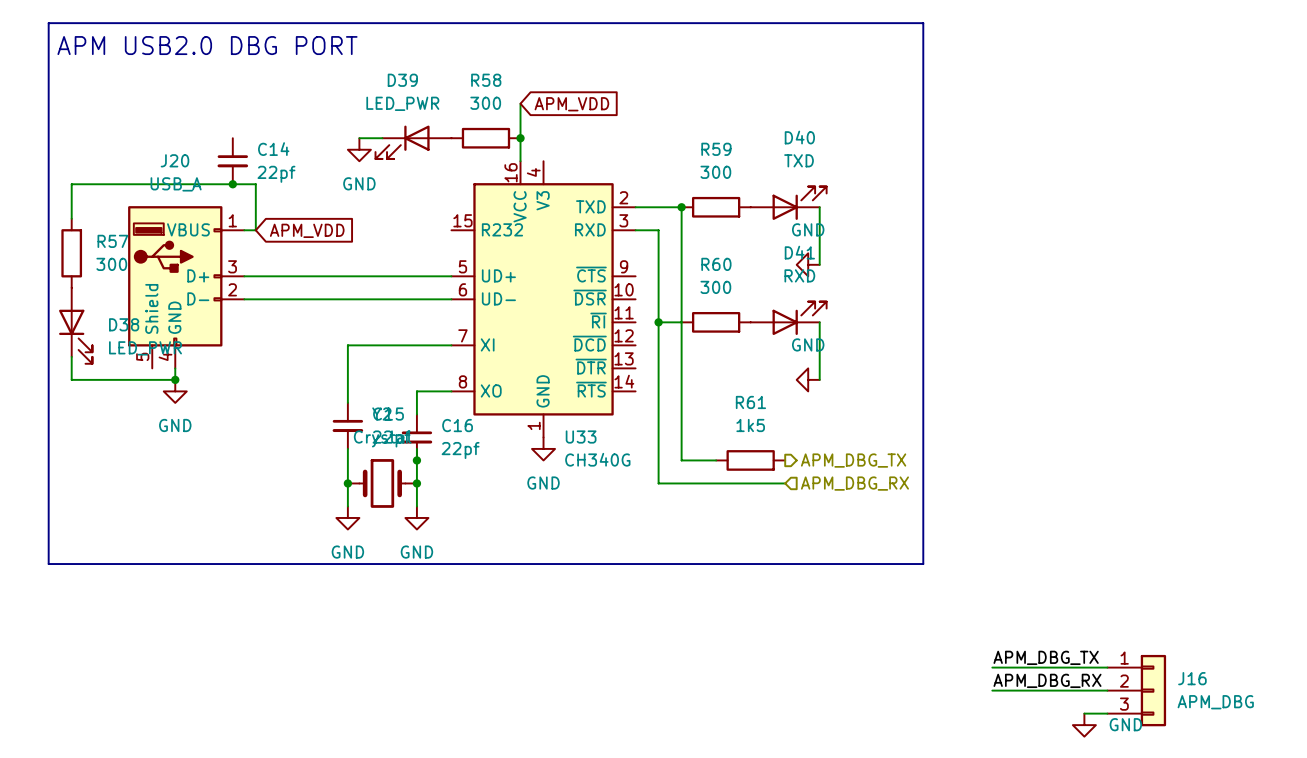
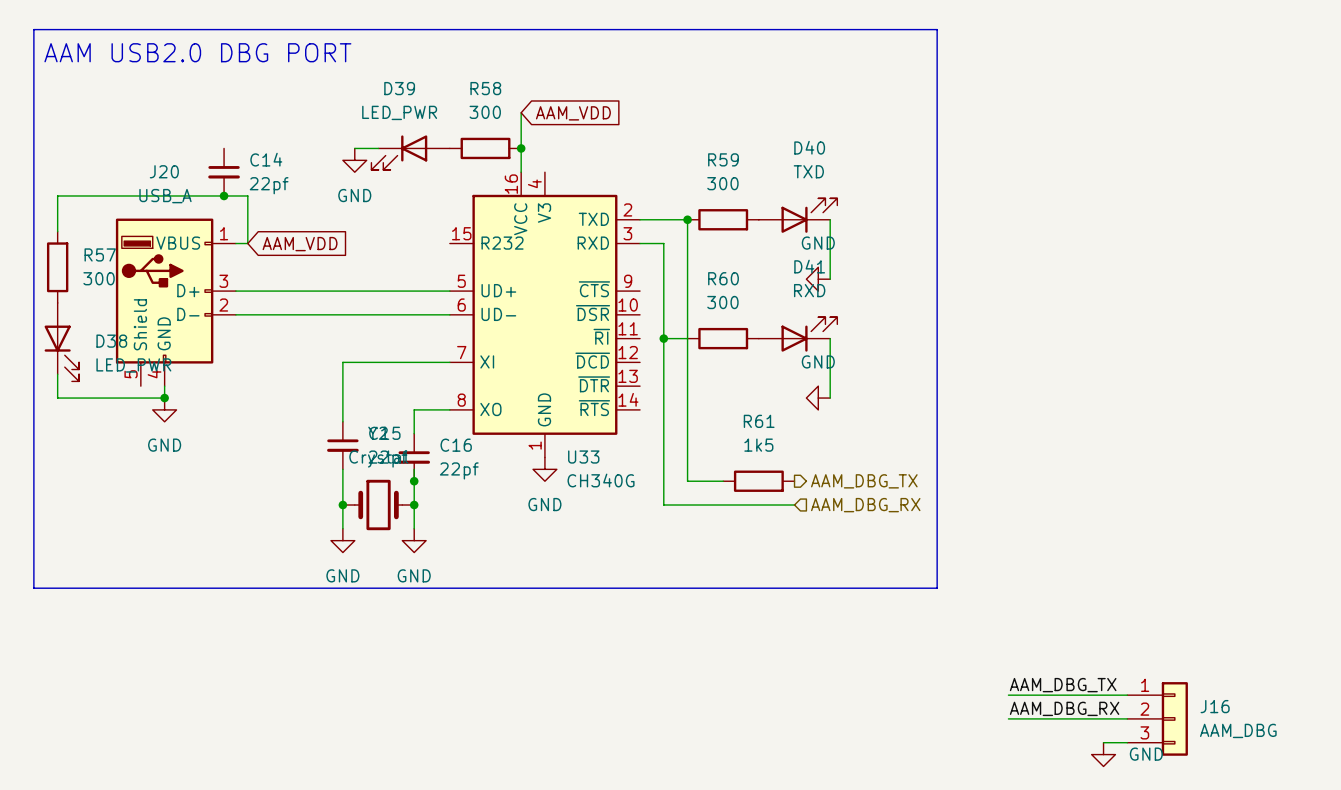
text: APM USB2.0 DBG PORT (207, 45) -> AAM USB2.0 DBG PORT (197, 52)
global label: APM_VDD (571, 104) -> AAM_VDD (573, 113)
global label: APM_VDD (307, 230) -> AAM_VDD (300, 244)
hierarchical label: APM_DBG_TX (853, 460) -> AAM_DBG_TX (864, 481)
hierarchical label: APM_DBG_RX (854, 483) -> AAM_DBG_RX (865, 505)
label: APM_DBG_TX (1046, 657) -> AAM_DBG_TX (1063, 685)
label: APM_DBG_RX (1047, 680) -> AAM_DBG_RX (1064, 708)
J16 value: APM_DBG (1215, 702) -> AAM_DBG (1238, 730)

